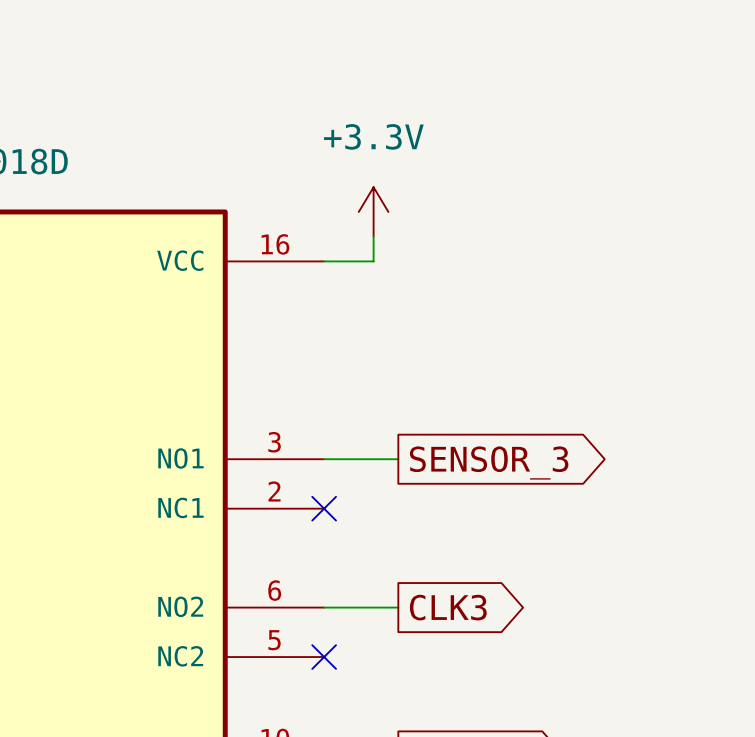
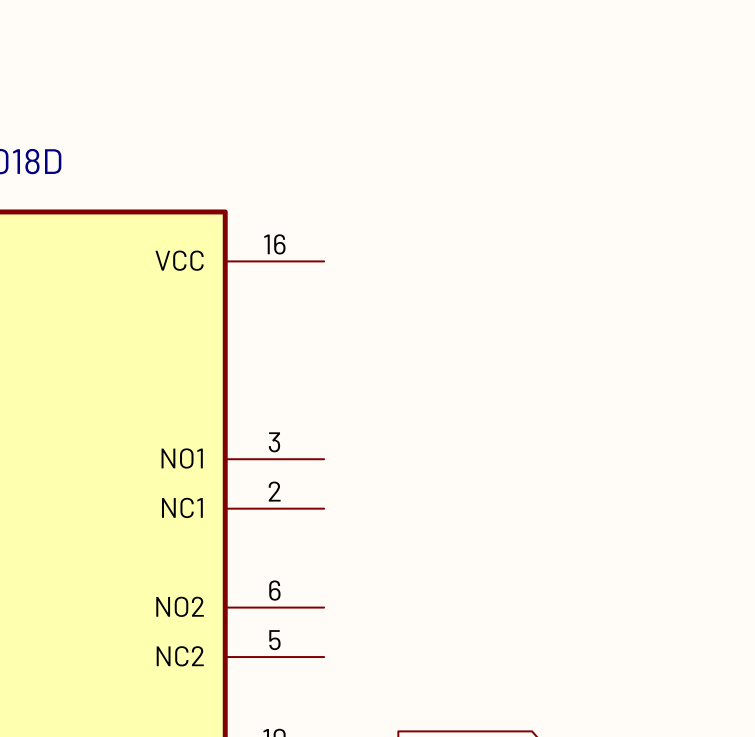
power symbol: +3.3V (373, 211) -> none
wire: (373, 236) (373, 261) (324, 261) -> none
wire: (324, 459) (398, 459) -> none
global label: SENSOR_3 (489, 463) -> none
no-connect mark: (324, 508) -> none
wire: (324, 607) (398, 607) -> none
global label: CLK3 (448, 607) -> none
no-connect mark: (324, 657) -> none

